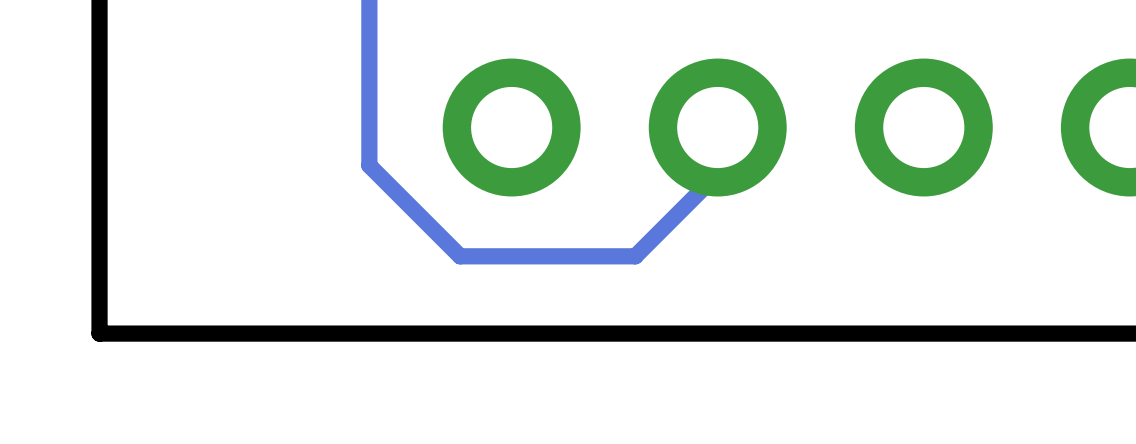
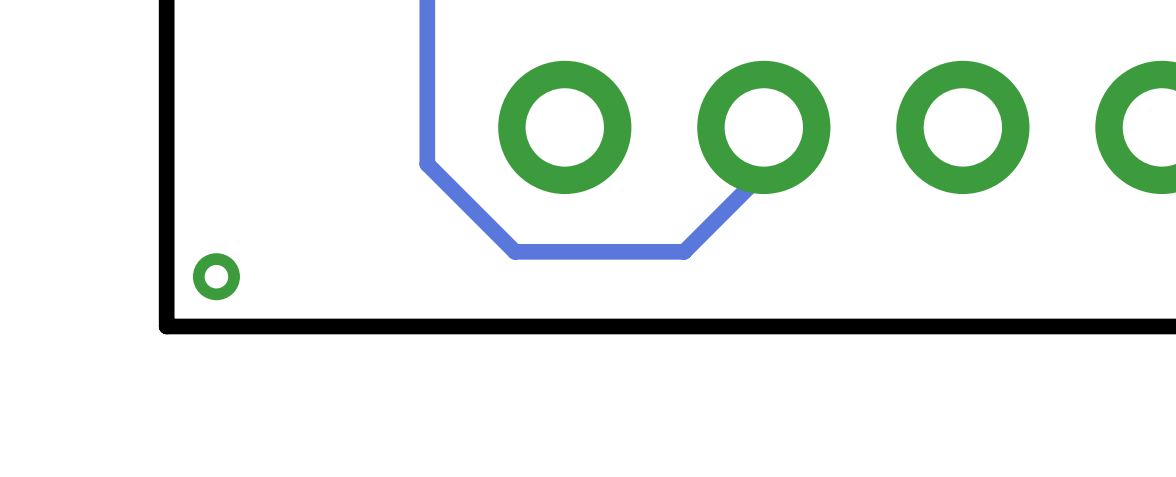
via: none -> (216, 276)

